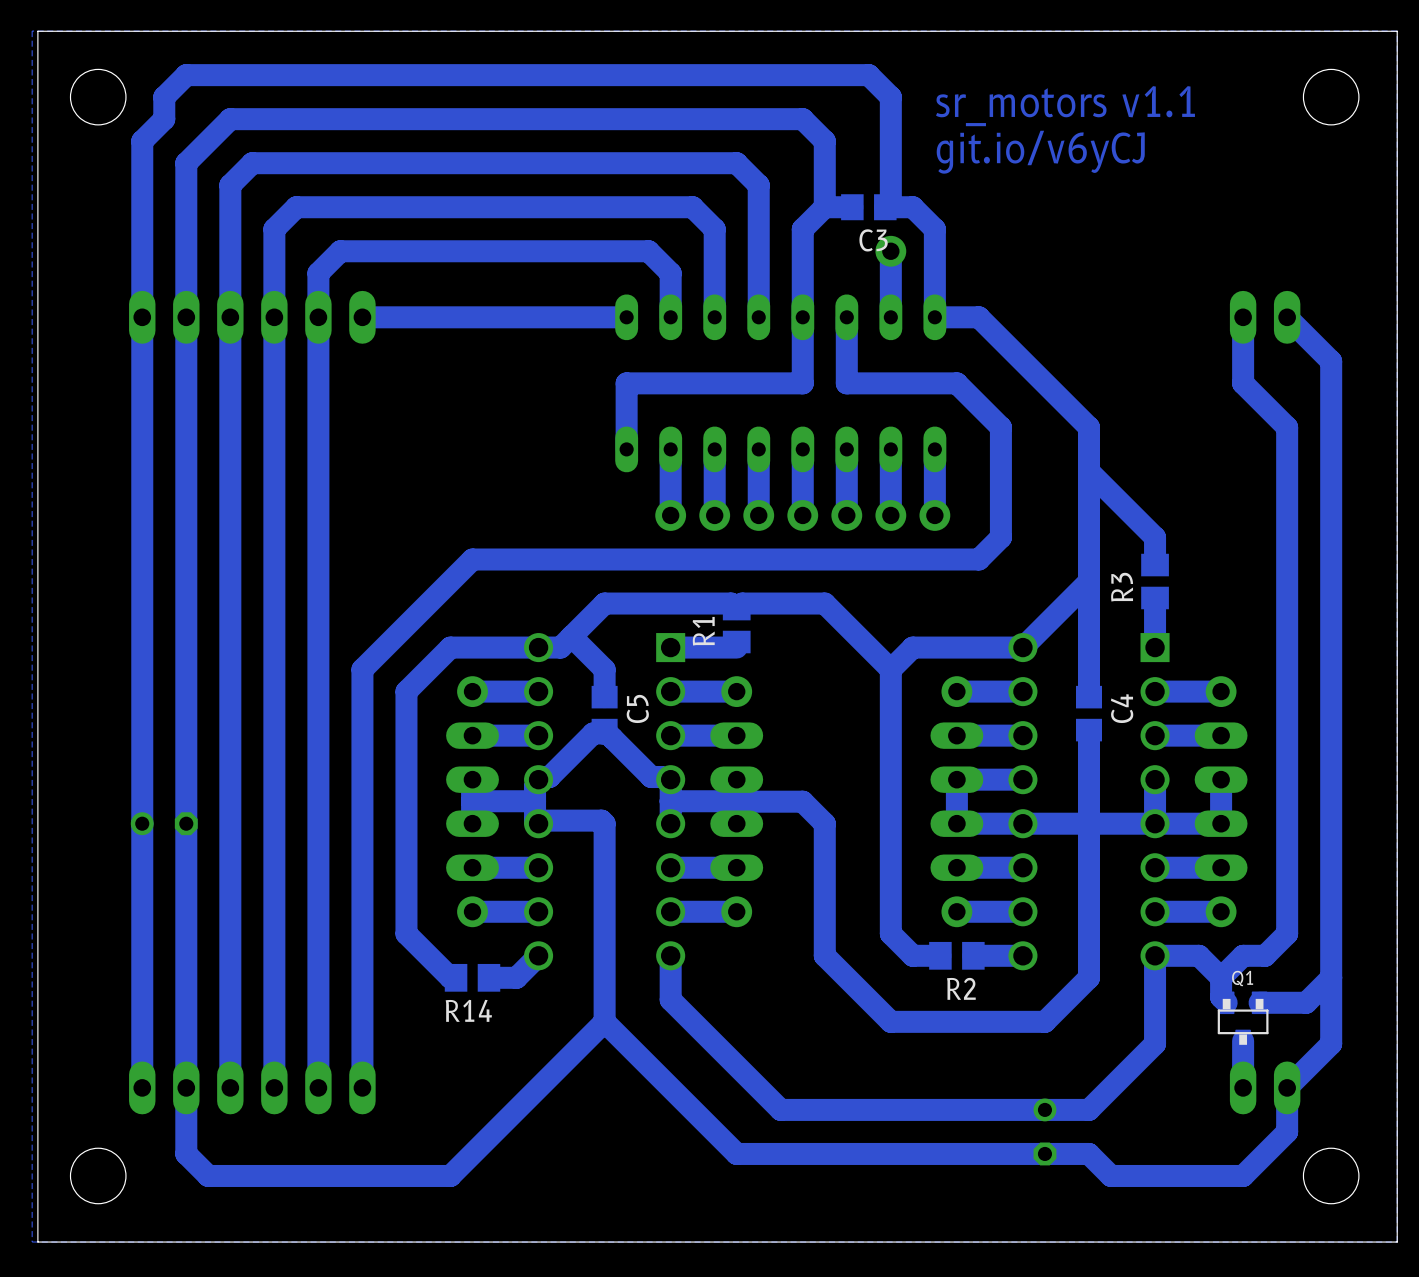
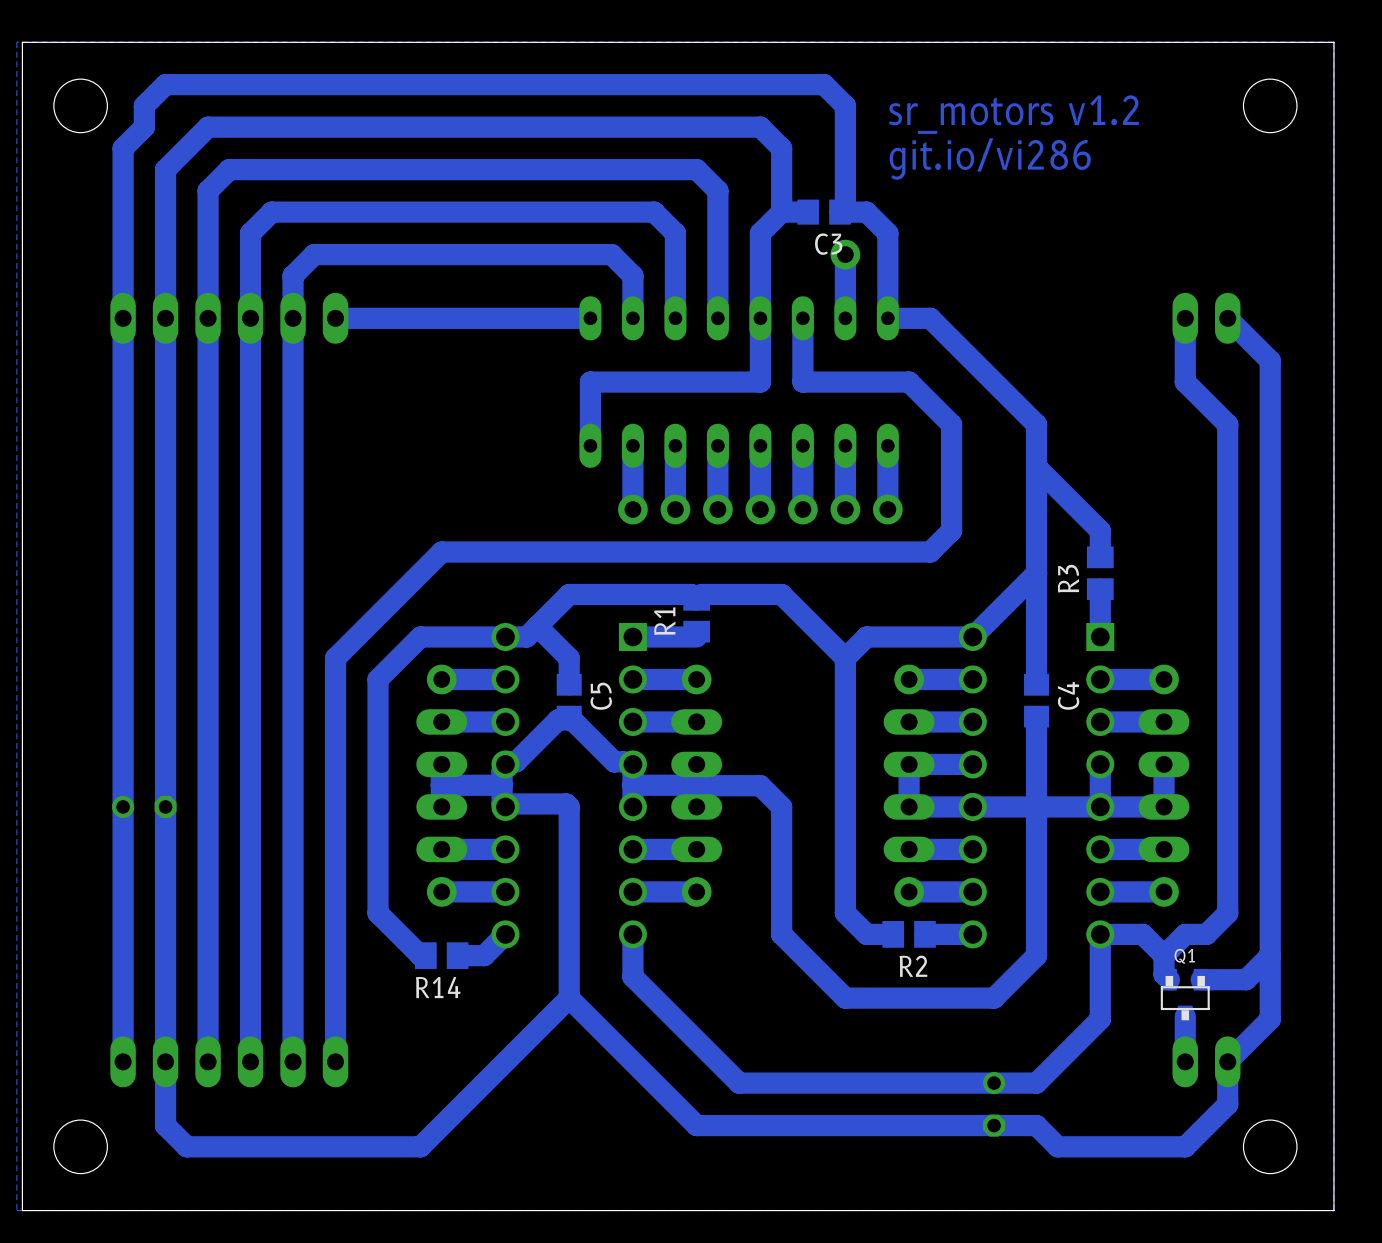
text: sr_motors v1.1 (1065, 106) -> sr_motors v1.2 (1013, 114)
text: git.io/v6yCJ (1040, 152) -> git.io/vi286 (990, 159)

